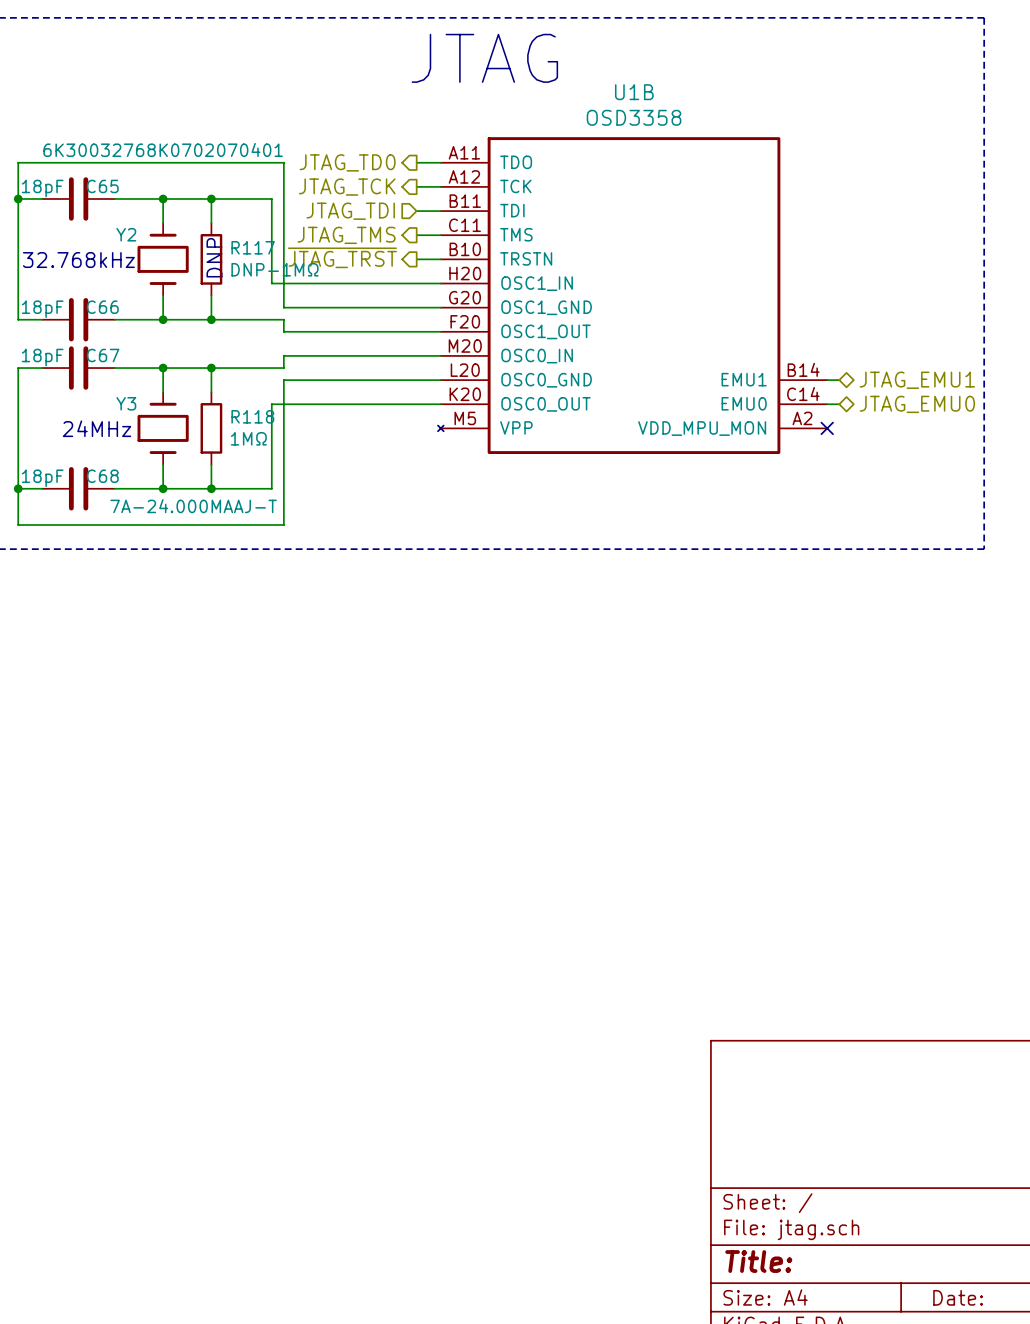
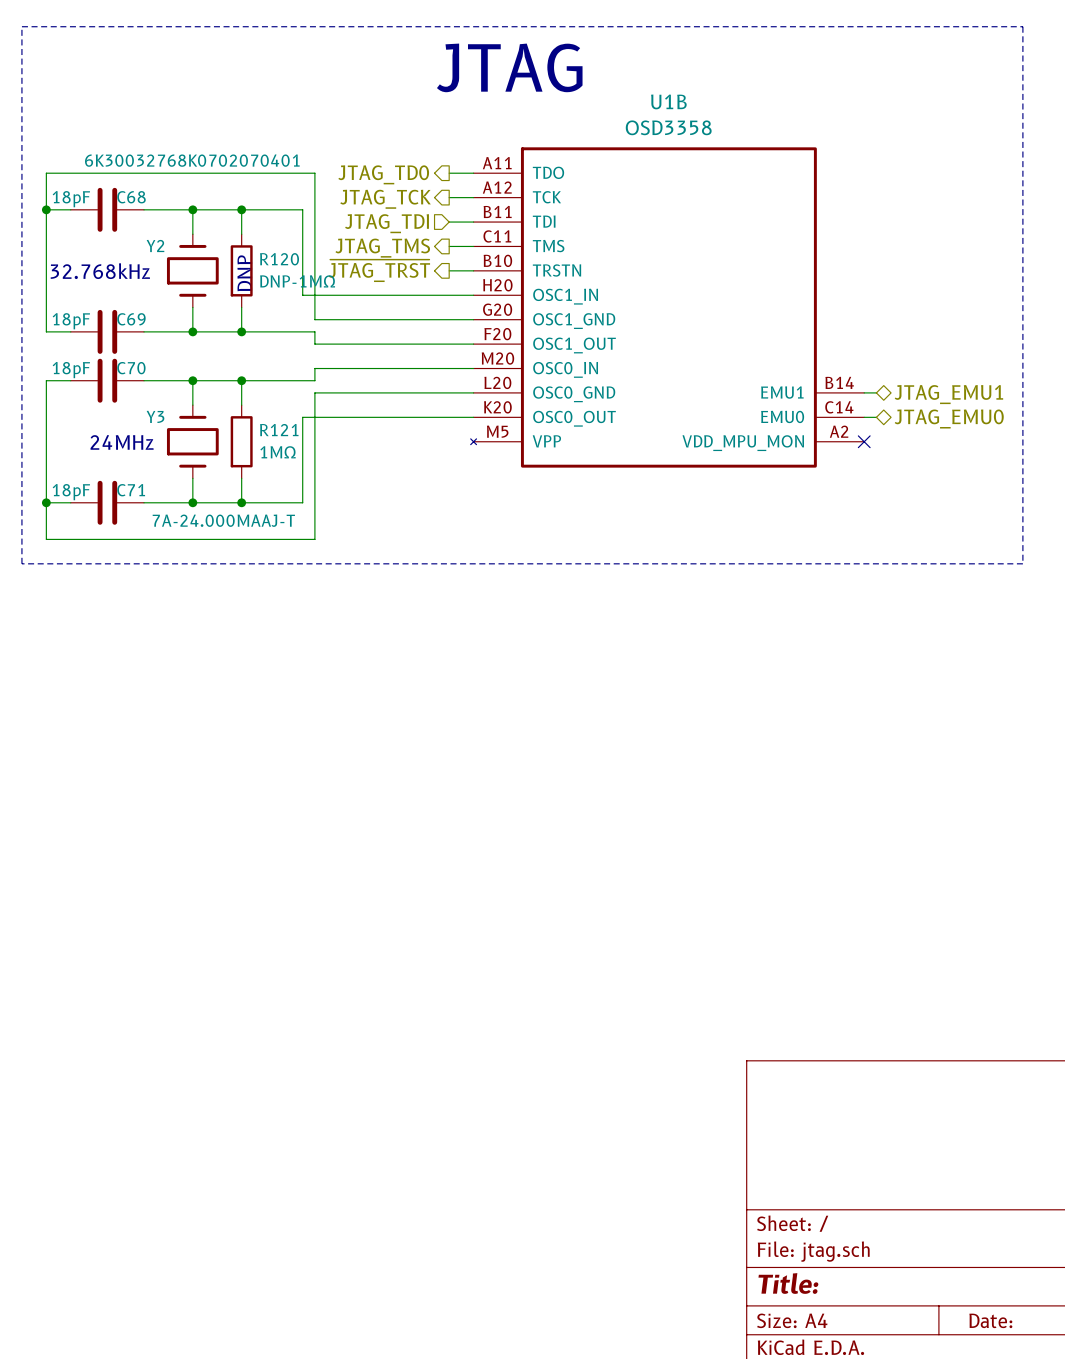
C65 name: C65 (102, 186) -> C68 (131, 197)
R117 name: R117 (253, 247) -> R120 (279, 259)
C66 name: C66 (102, 307) -> C69 (131, 319)
C67 name: C67 (103, 355) -> C70 (131, 368)
R118 name: R118 (252, 416) -> R121 (279, 430)
C68 name: C68 (102, 476) -> C71 (131, 490)

